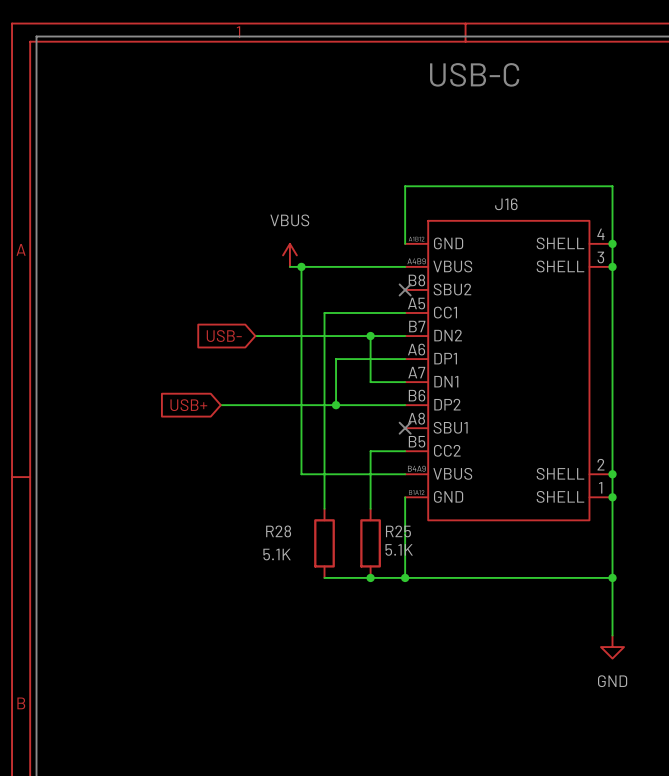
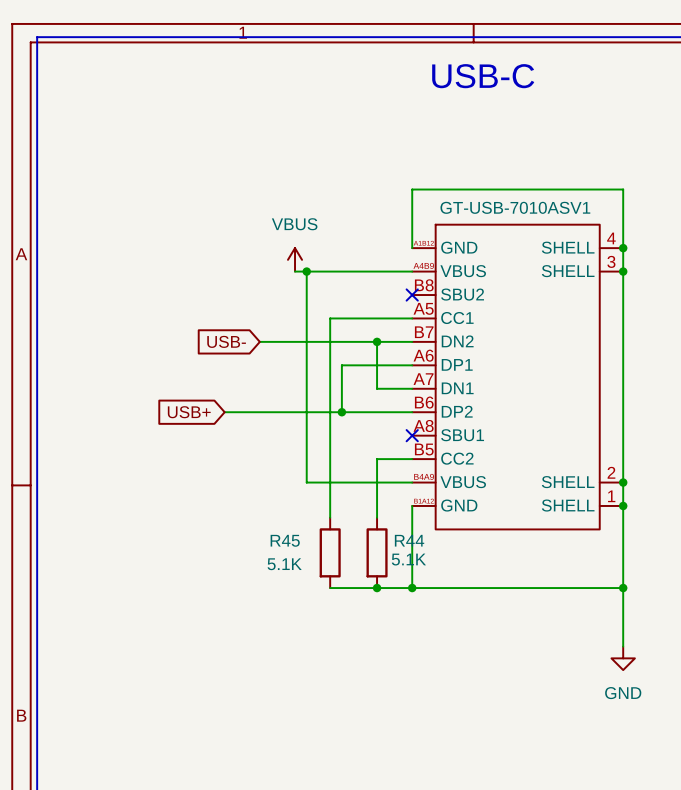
J16 name: J16 (506, 204) -> GT-USB-7010ASV1 (515, 207)
R28 name: R28 (278, 531) -> R45 (285, 540)
R25 name: R25 (398, 531) -> R44 (409, 540)

